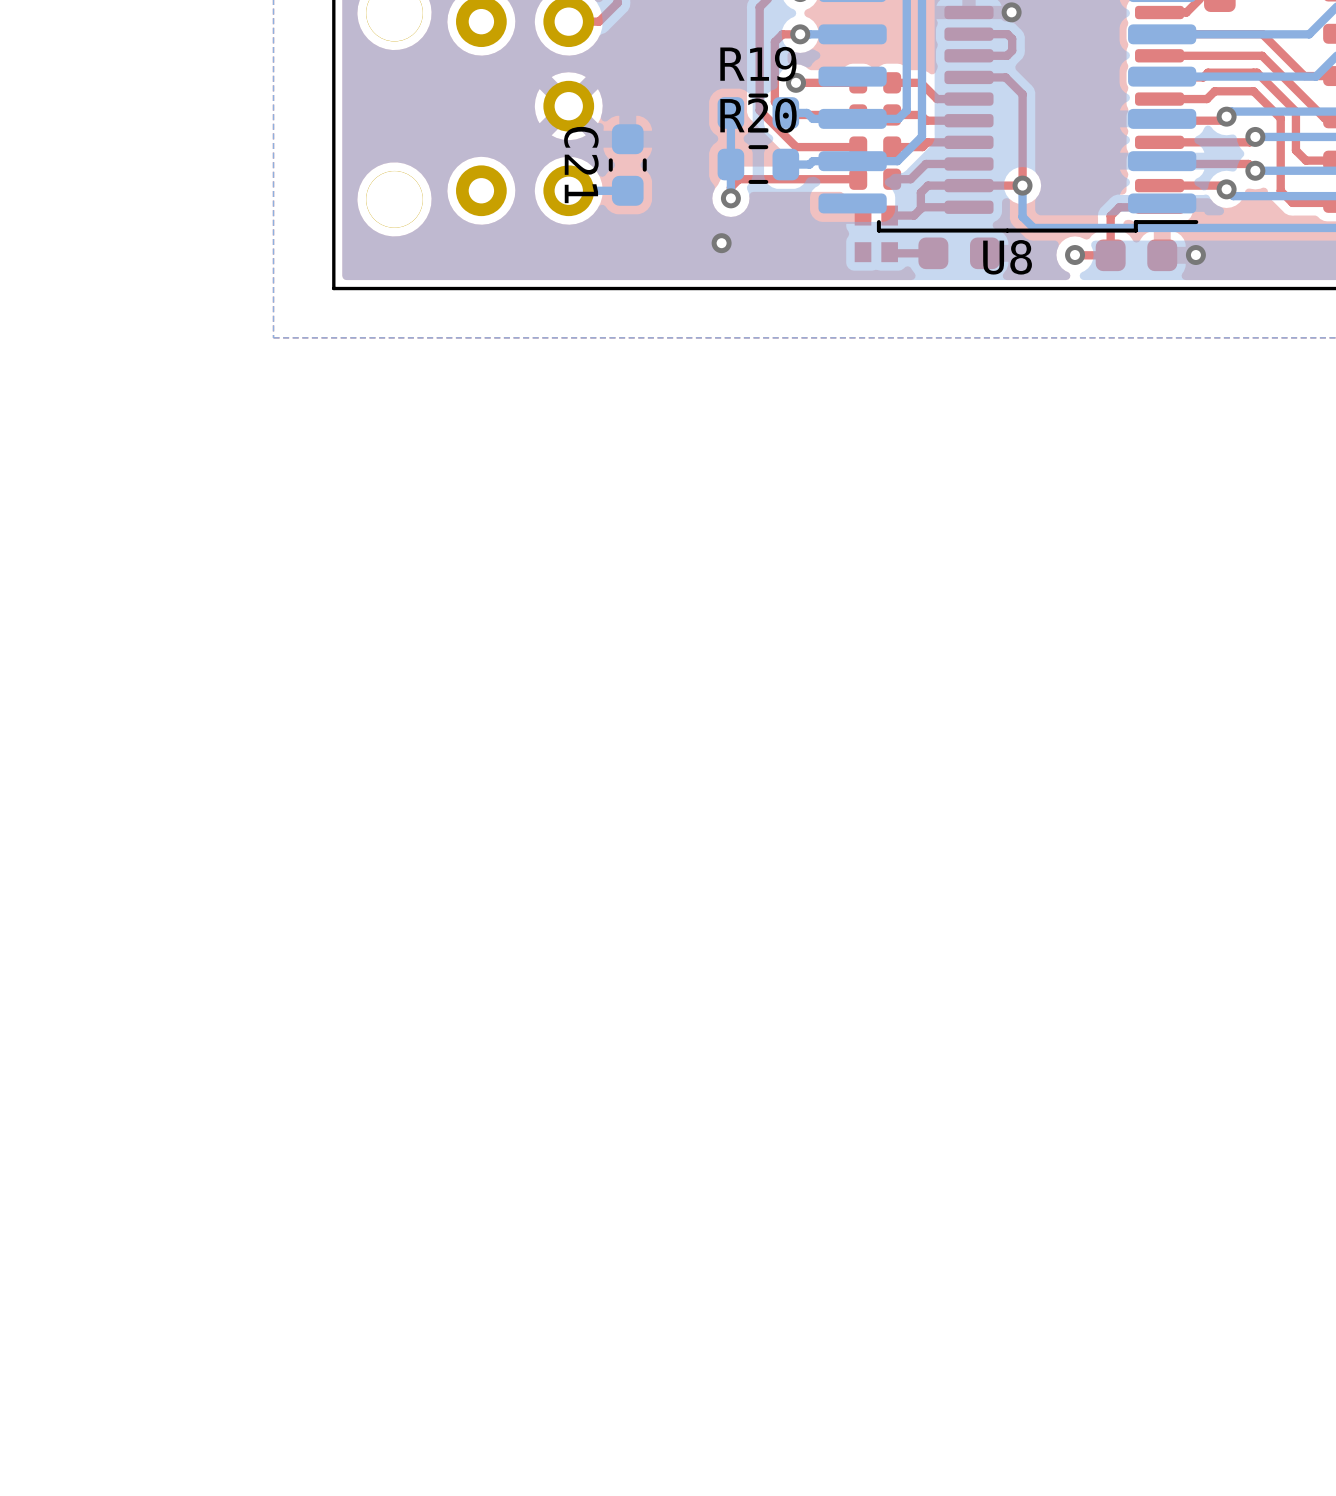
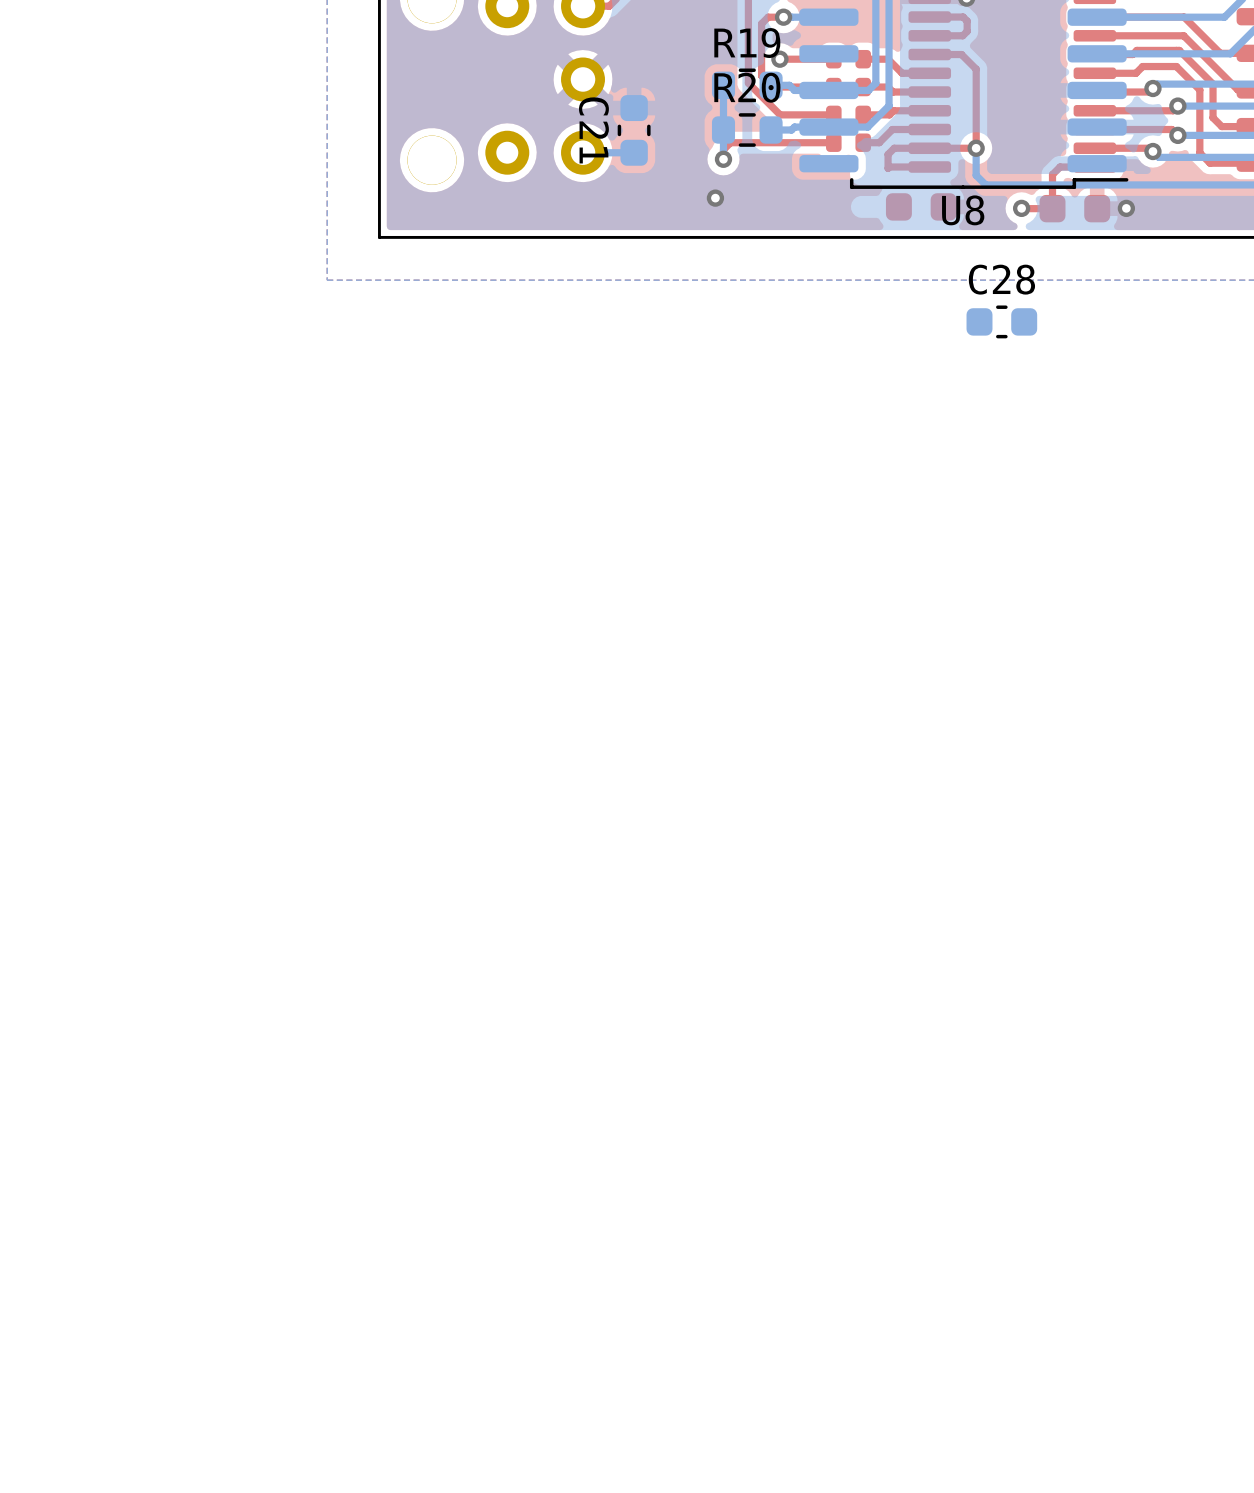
top track: (920, 208) (914, 215) (889, 215) -> none
part: (876, 233) -> none
top track: (933, 253) (890, 253) -> none
C28: none -> (1001, 321)

